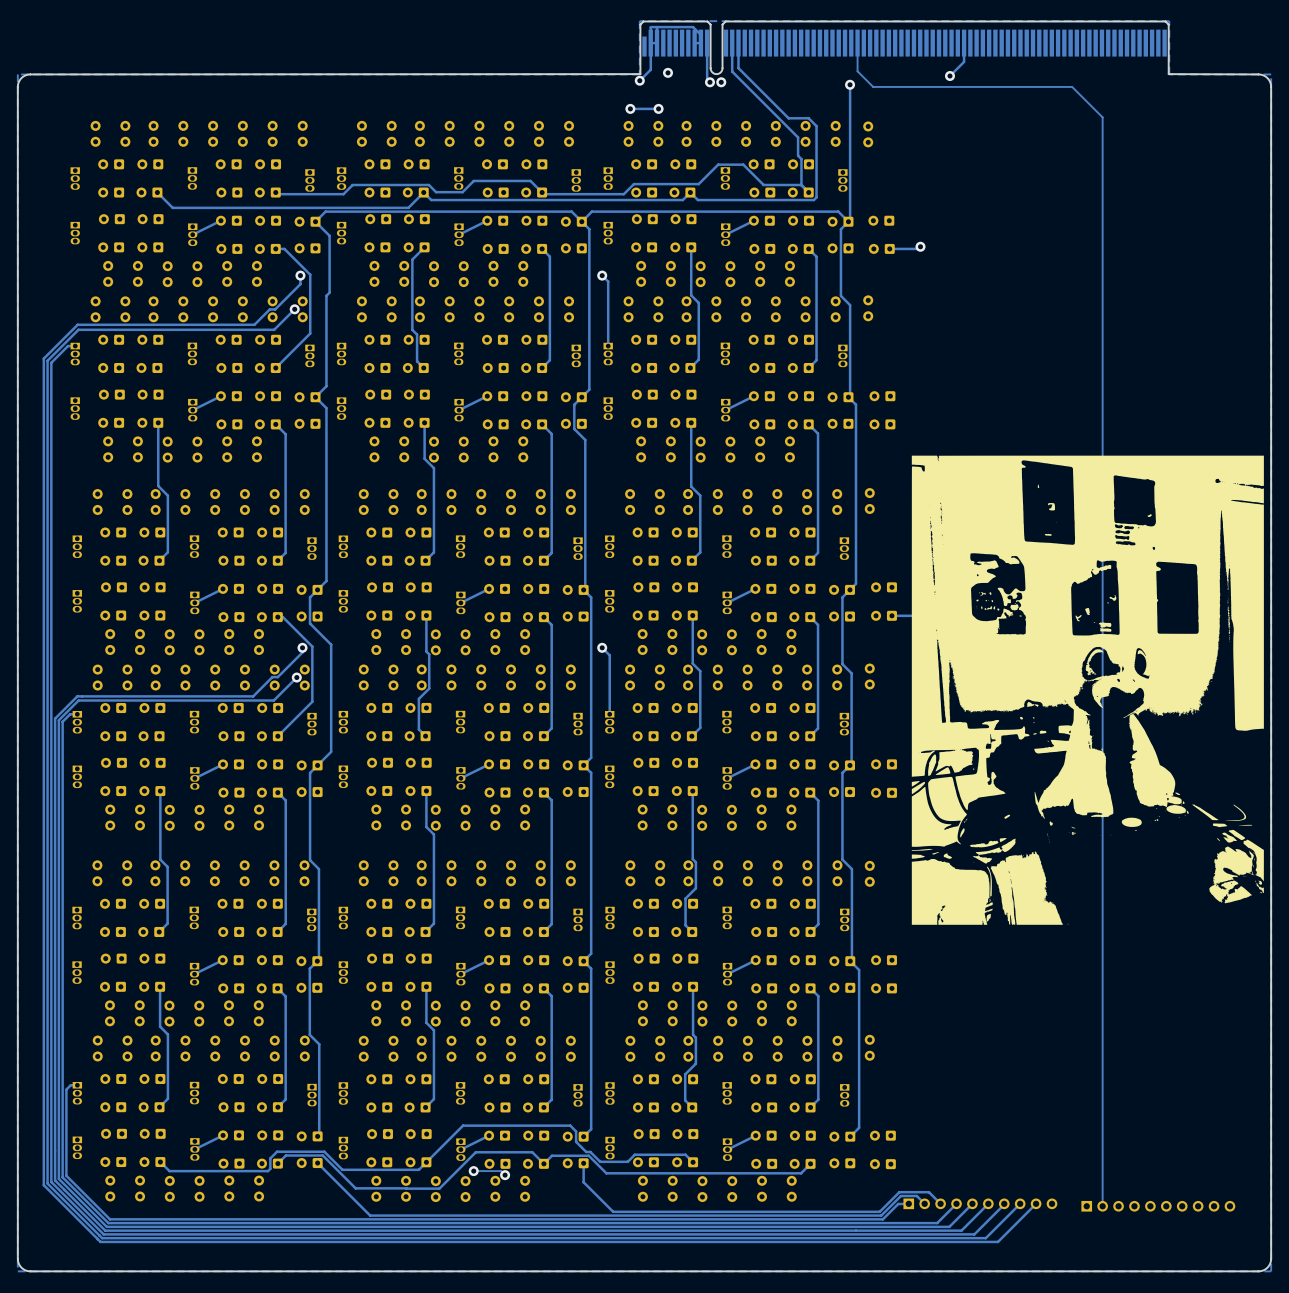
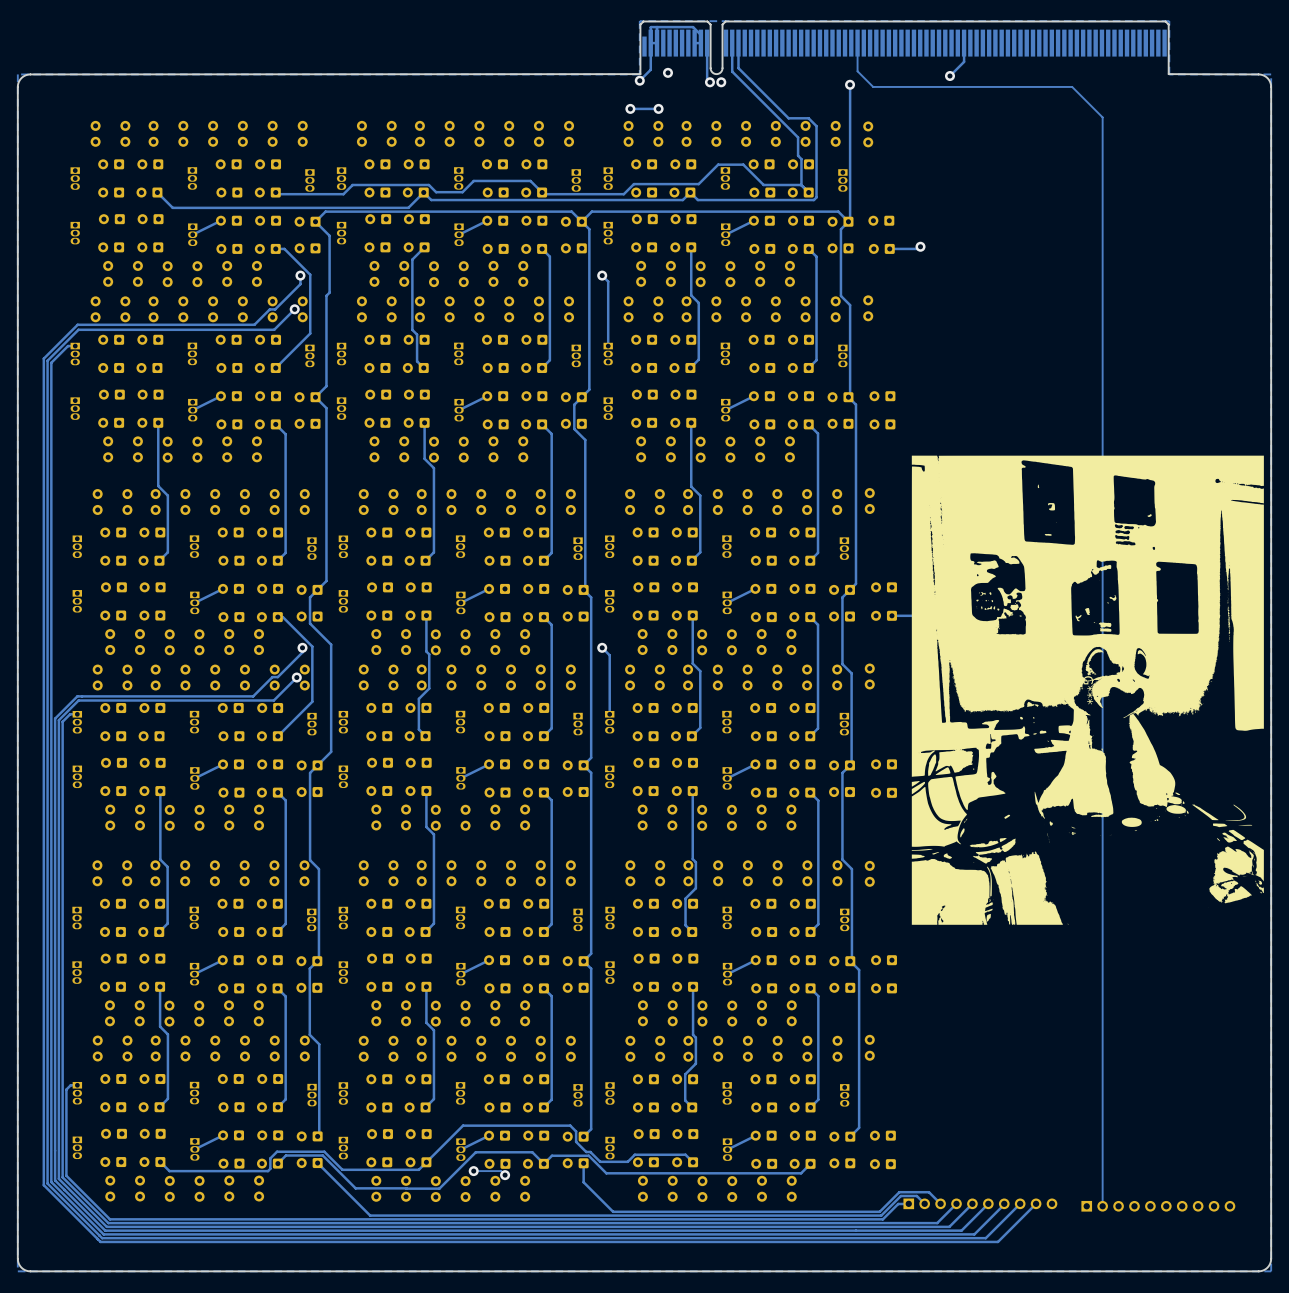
drawing: [911, 455, 1264, 925] -> none
G***: none -> (1087, 690)

